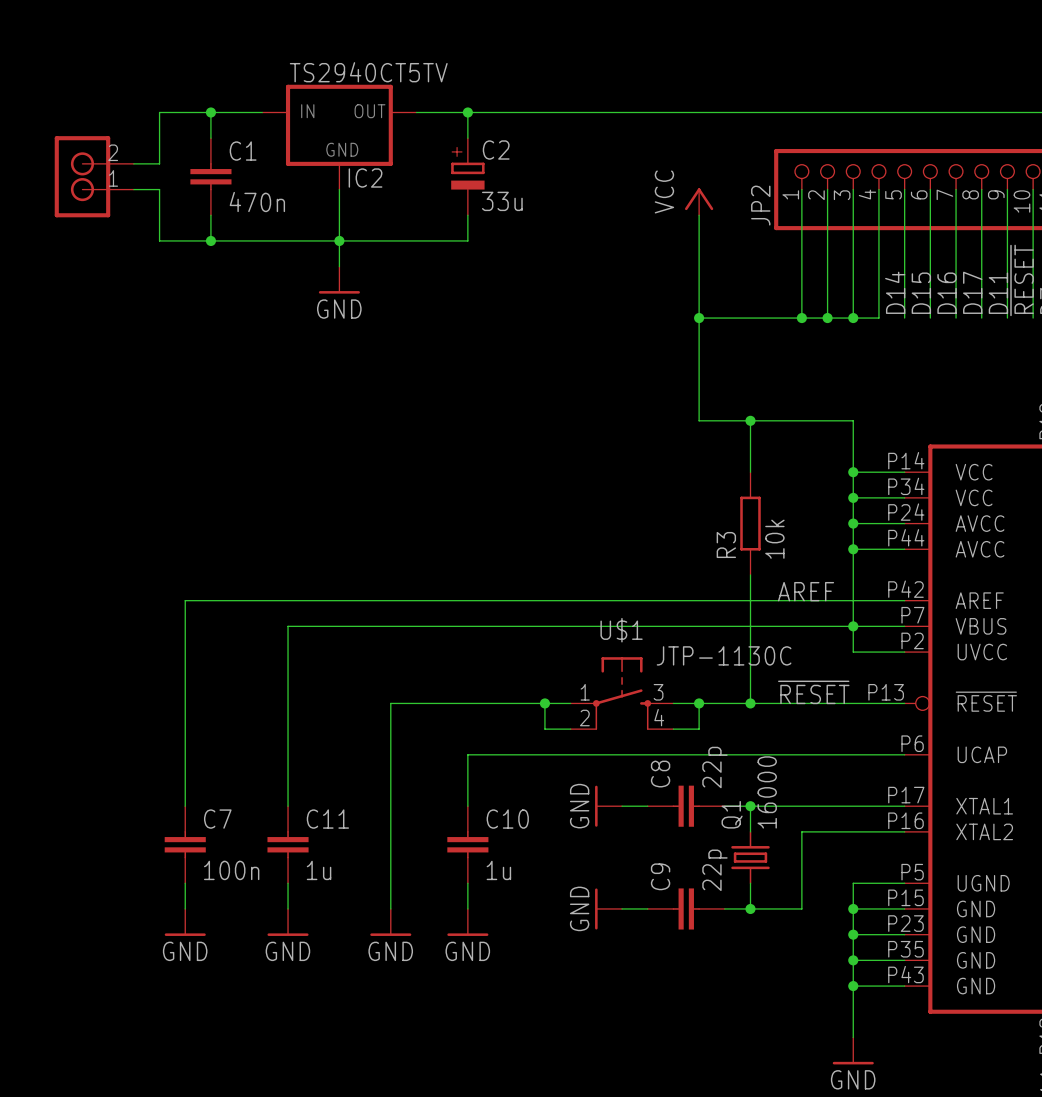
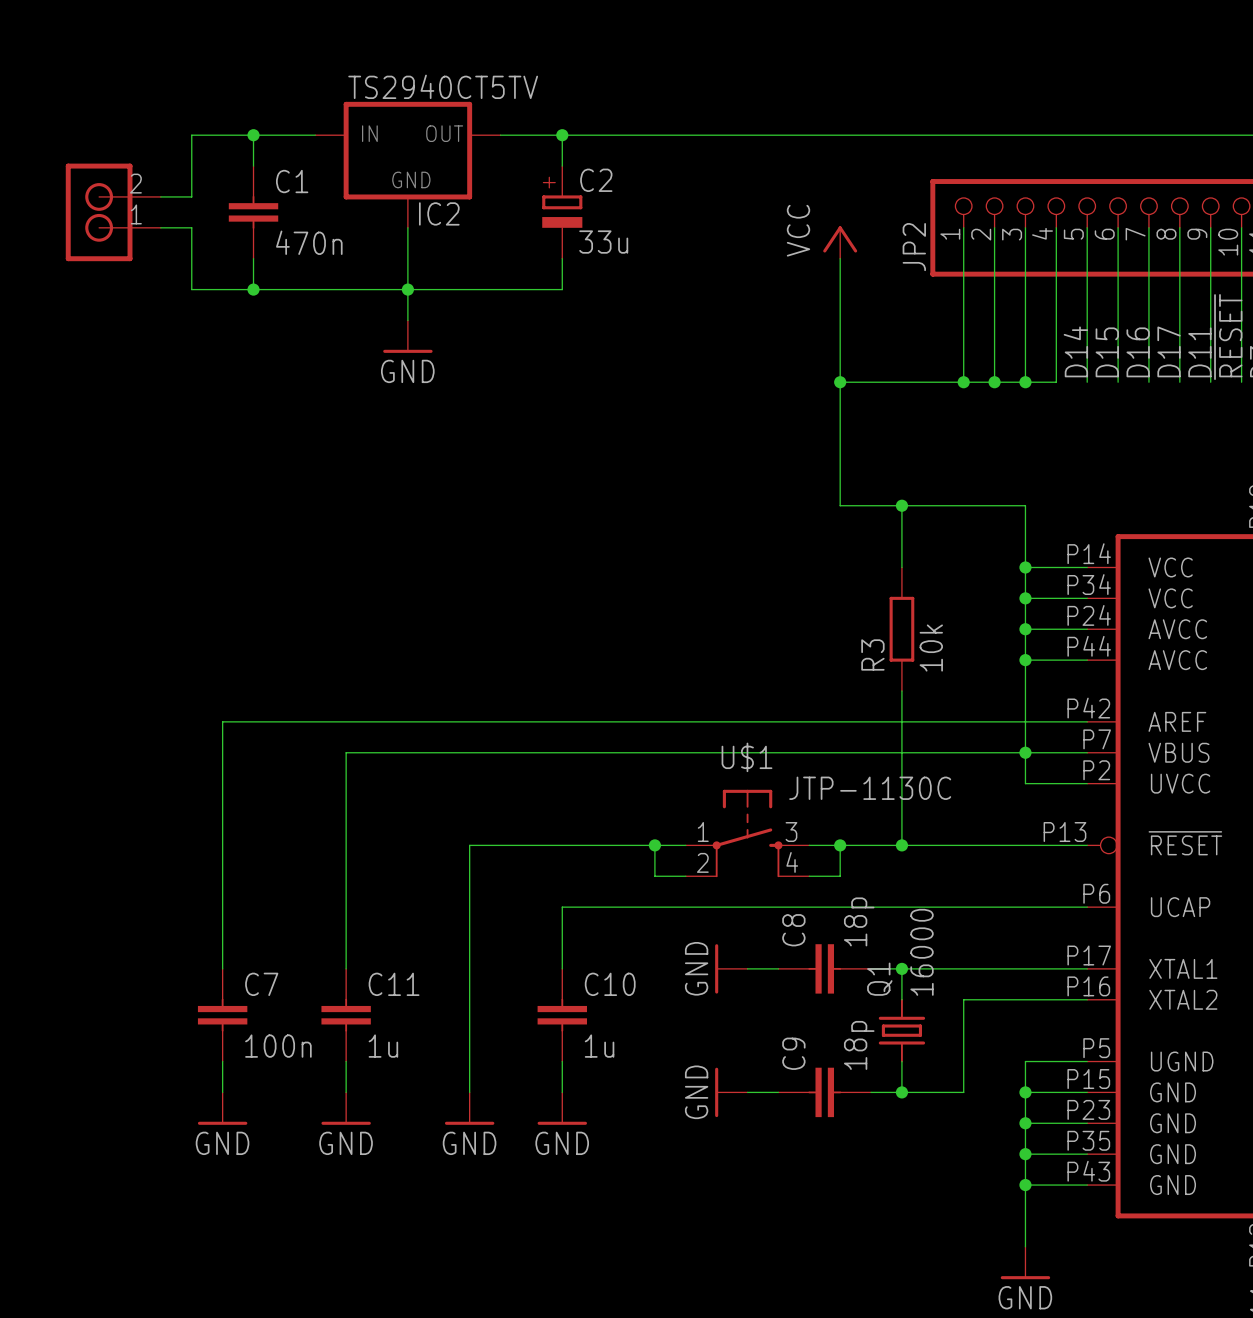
label: AREF (806, 591) -> none
label: ~{RESET} (813, 692) -> none
C8 value: 22p (714, 767) -> 18p (859, 921)
C9 value: 22p (714, 870) -> 18p (859, 1045)

